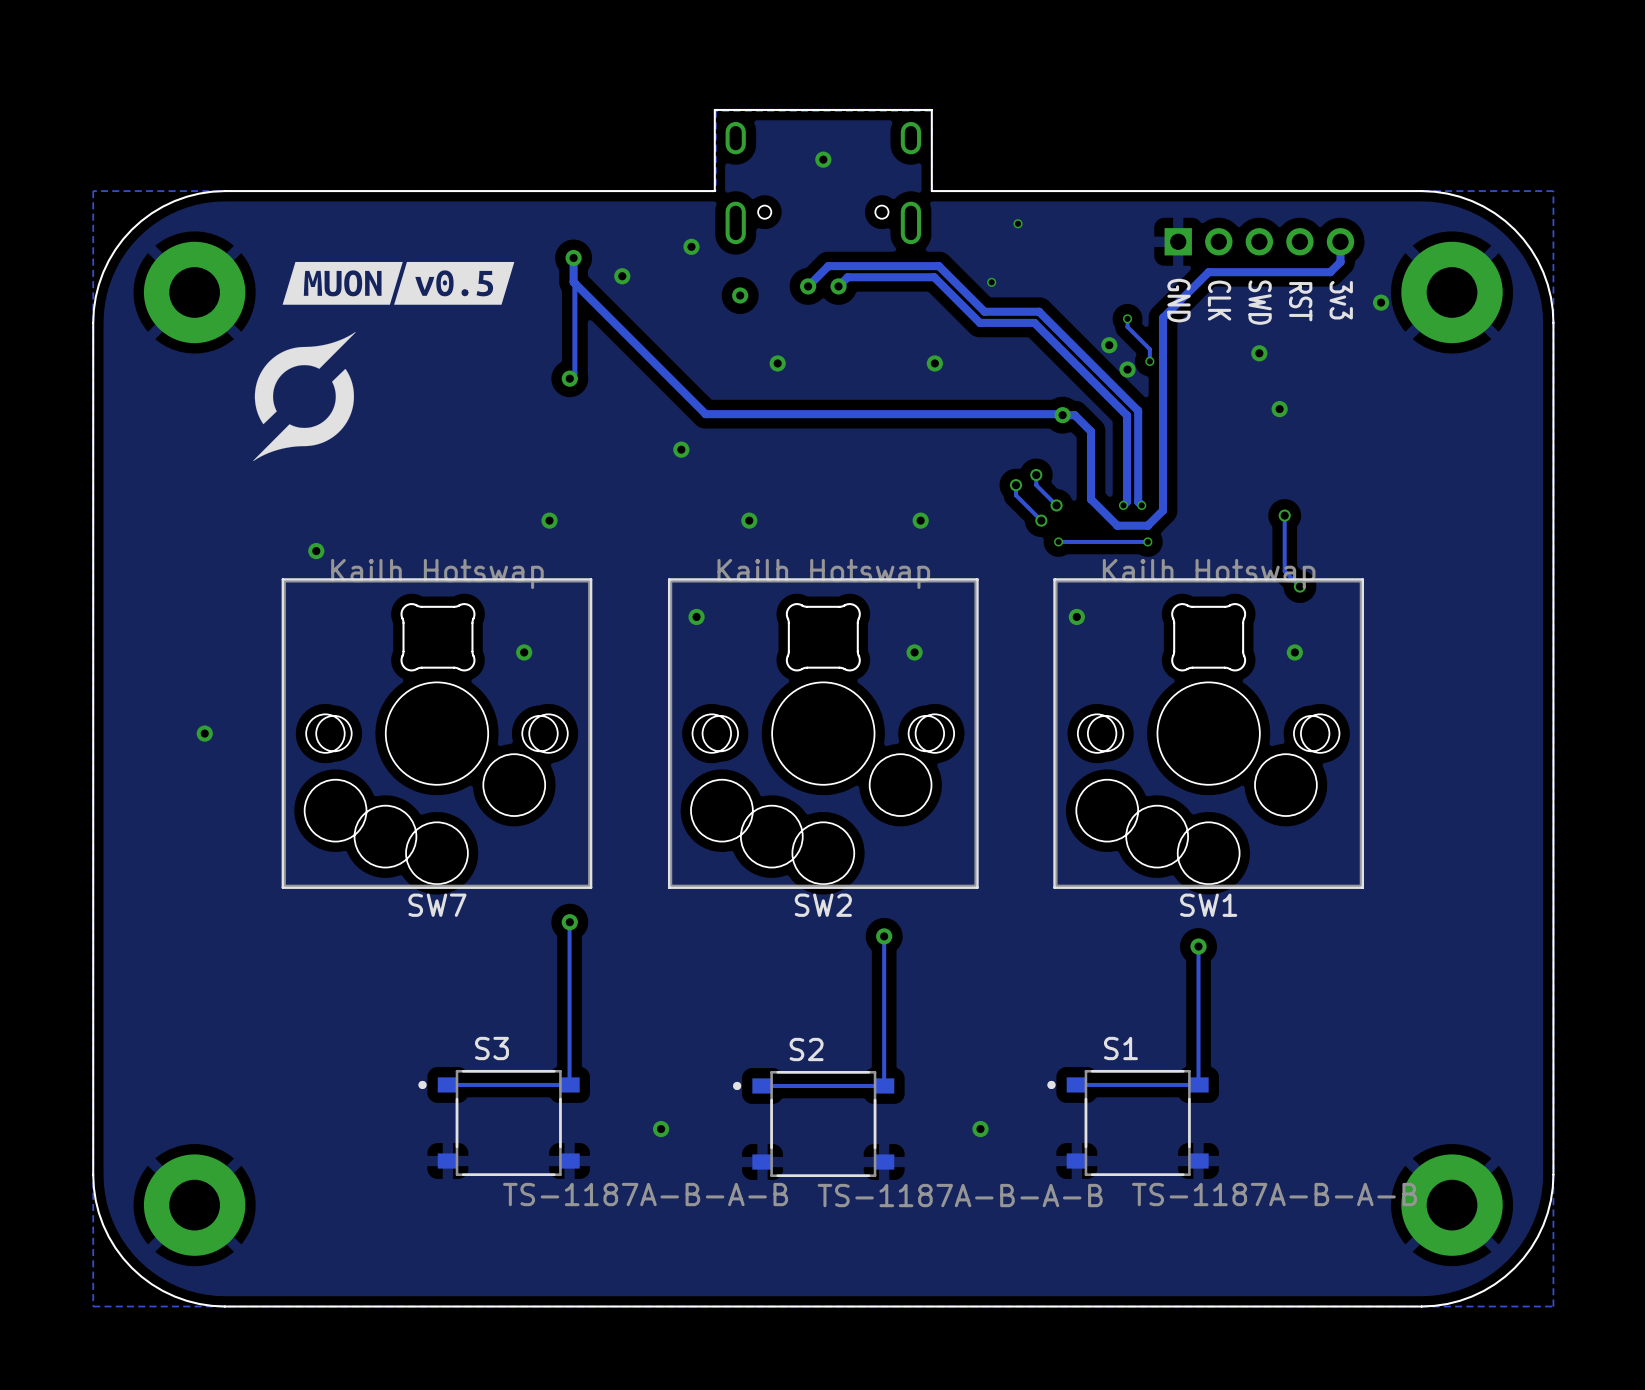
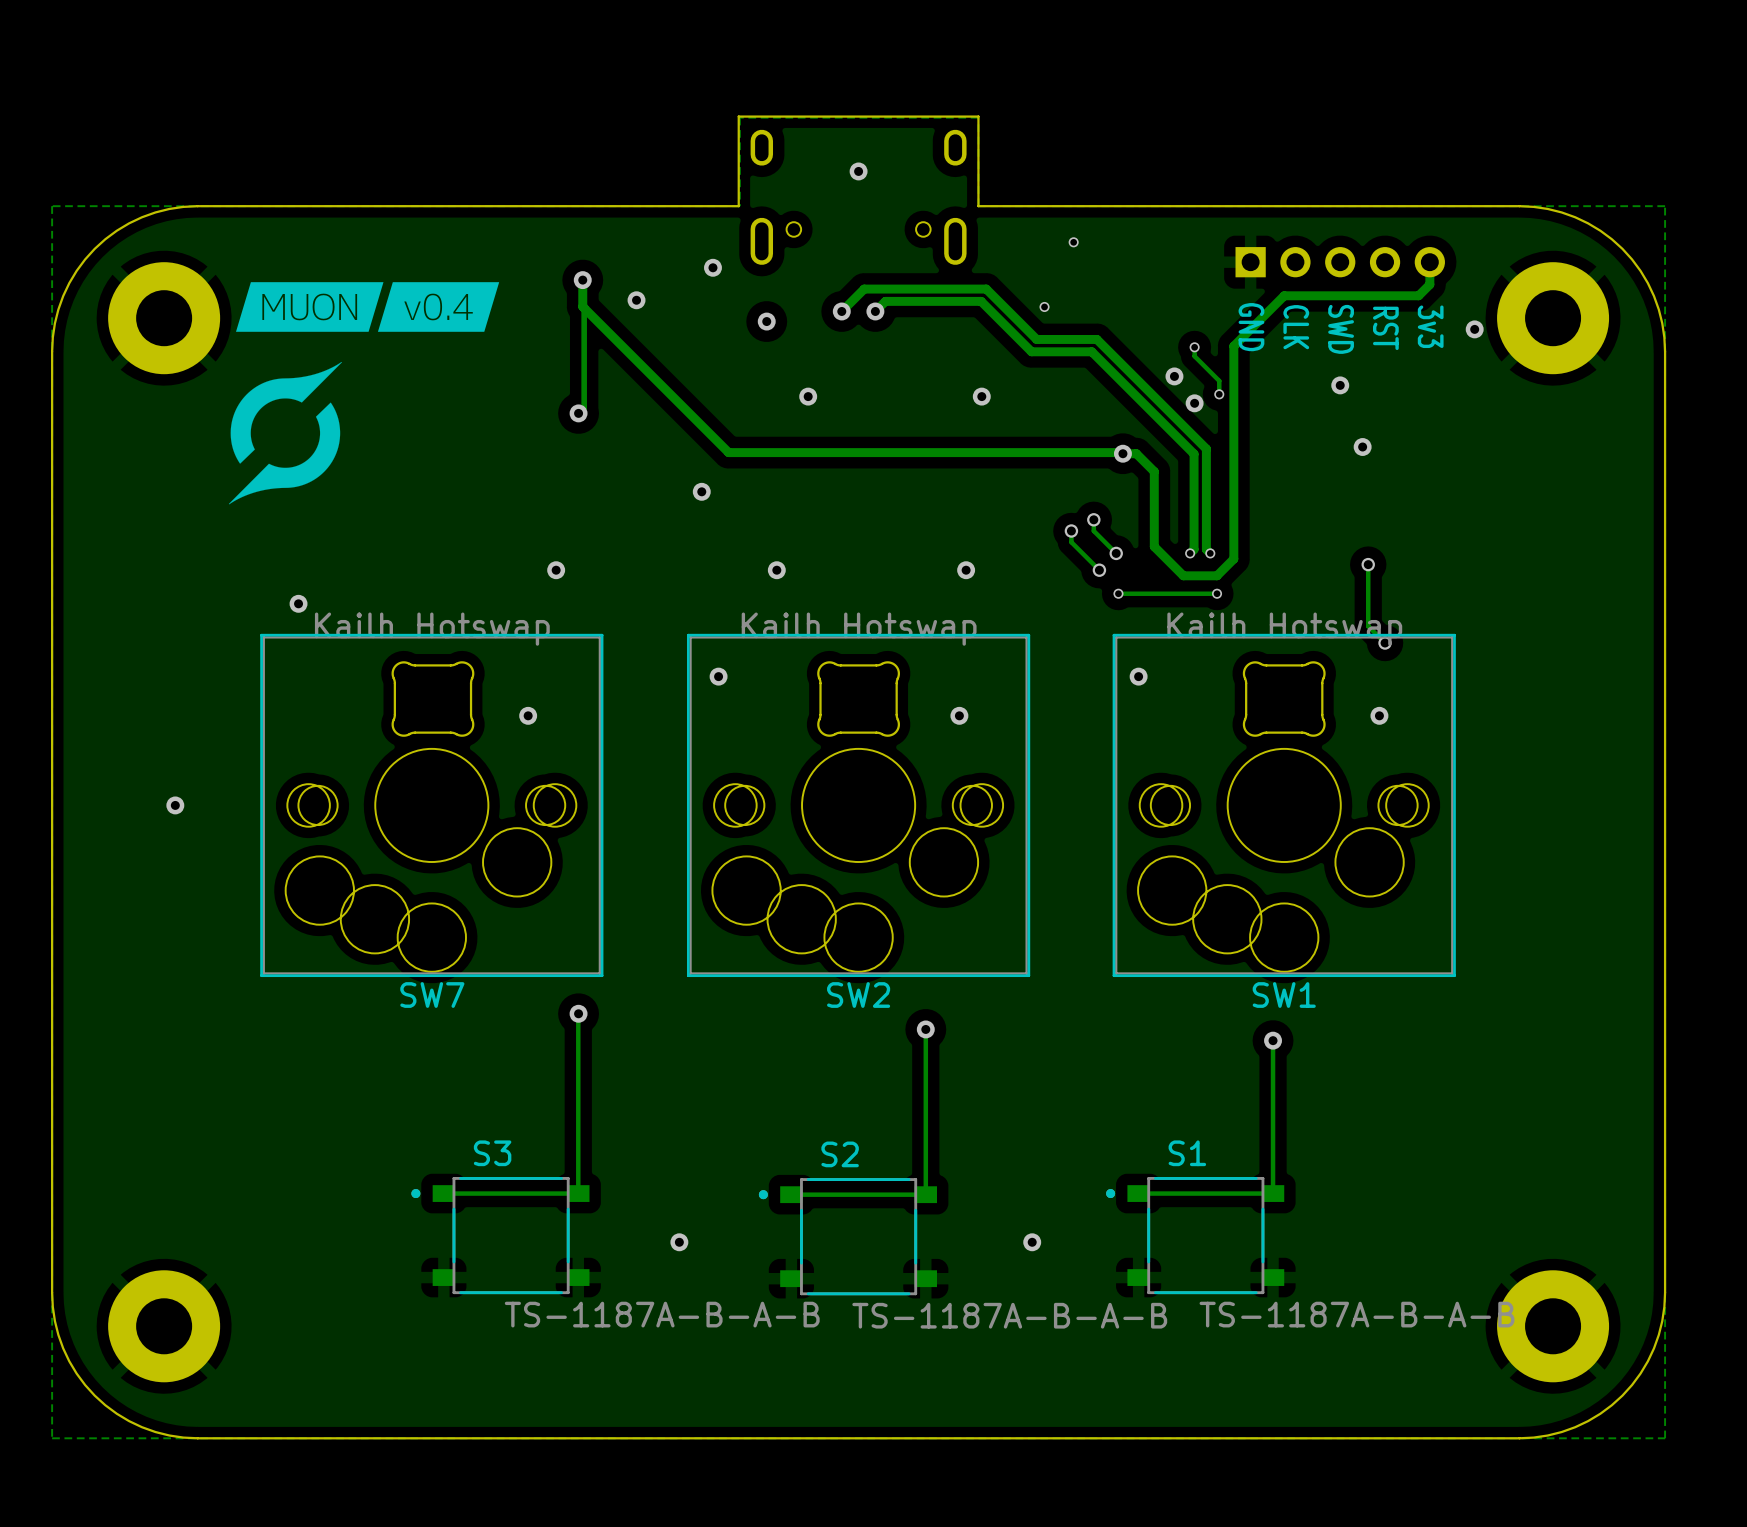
drawing shape: [282, 261, 403, 305] -> [235, 282, 384, 332]
drawing shape: [394, 261, 515, 305] -> [377, 282, 500, 332]

